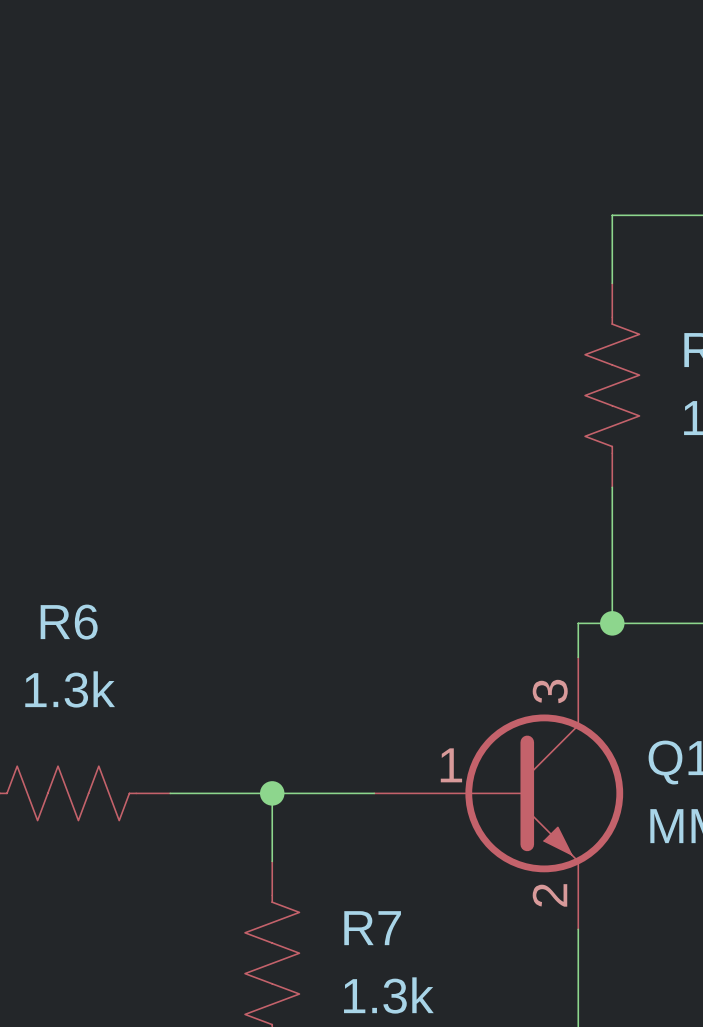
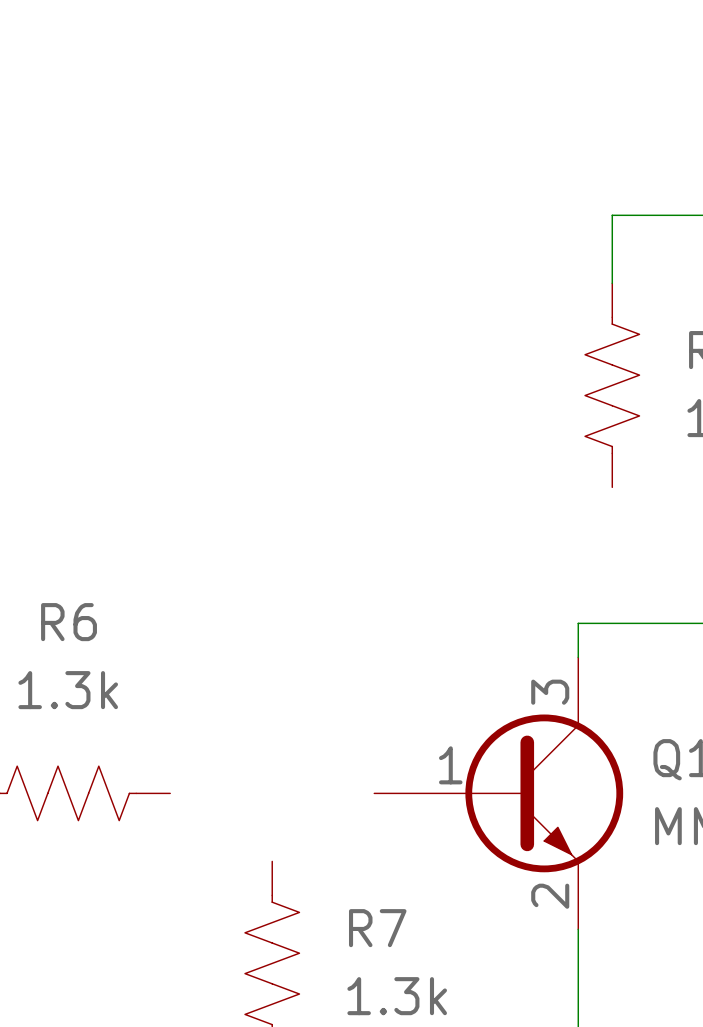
wire: (612, 487) (612, 623) -> none
junction: (612, 623) -> none
wire: (170, 793) (374, 793) -> none
wire: (272, 793) (272, 861) -> none
junction: (272, 793) -> none

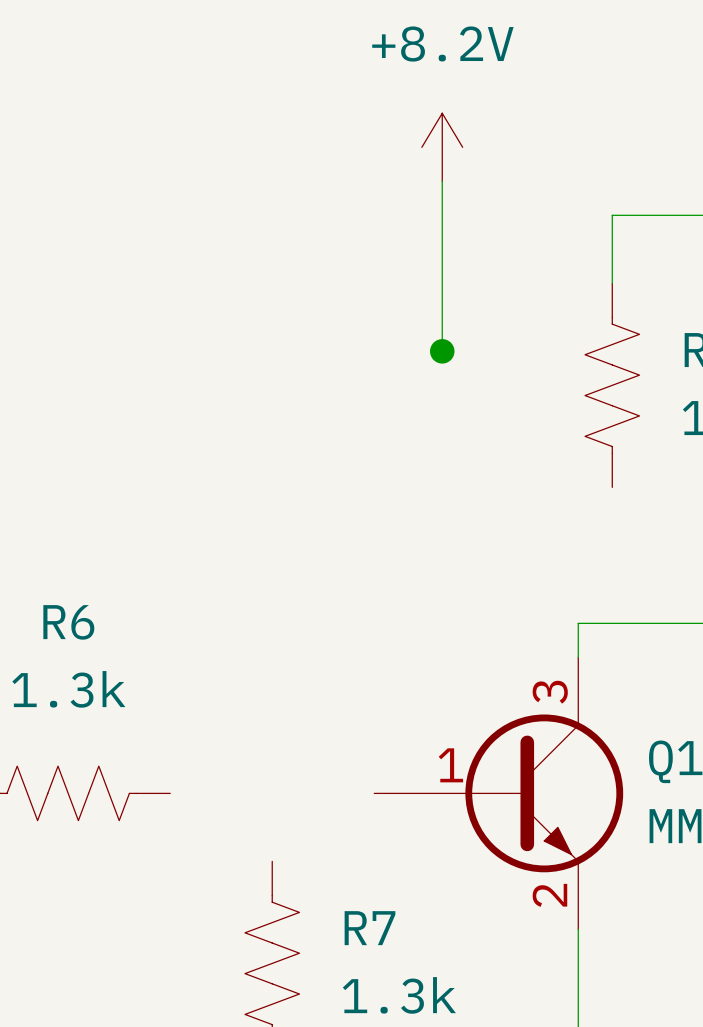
power symbol: none -> +8.2V (442, 147)
wire: none -> (442, 181) (442, 351)
junction: none -> (442, 351)

